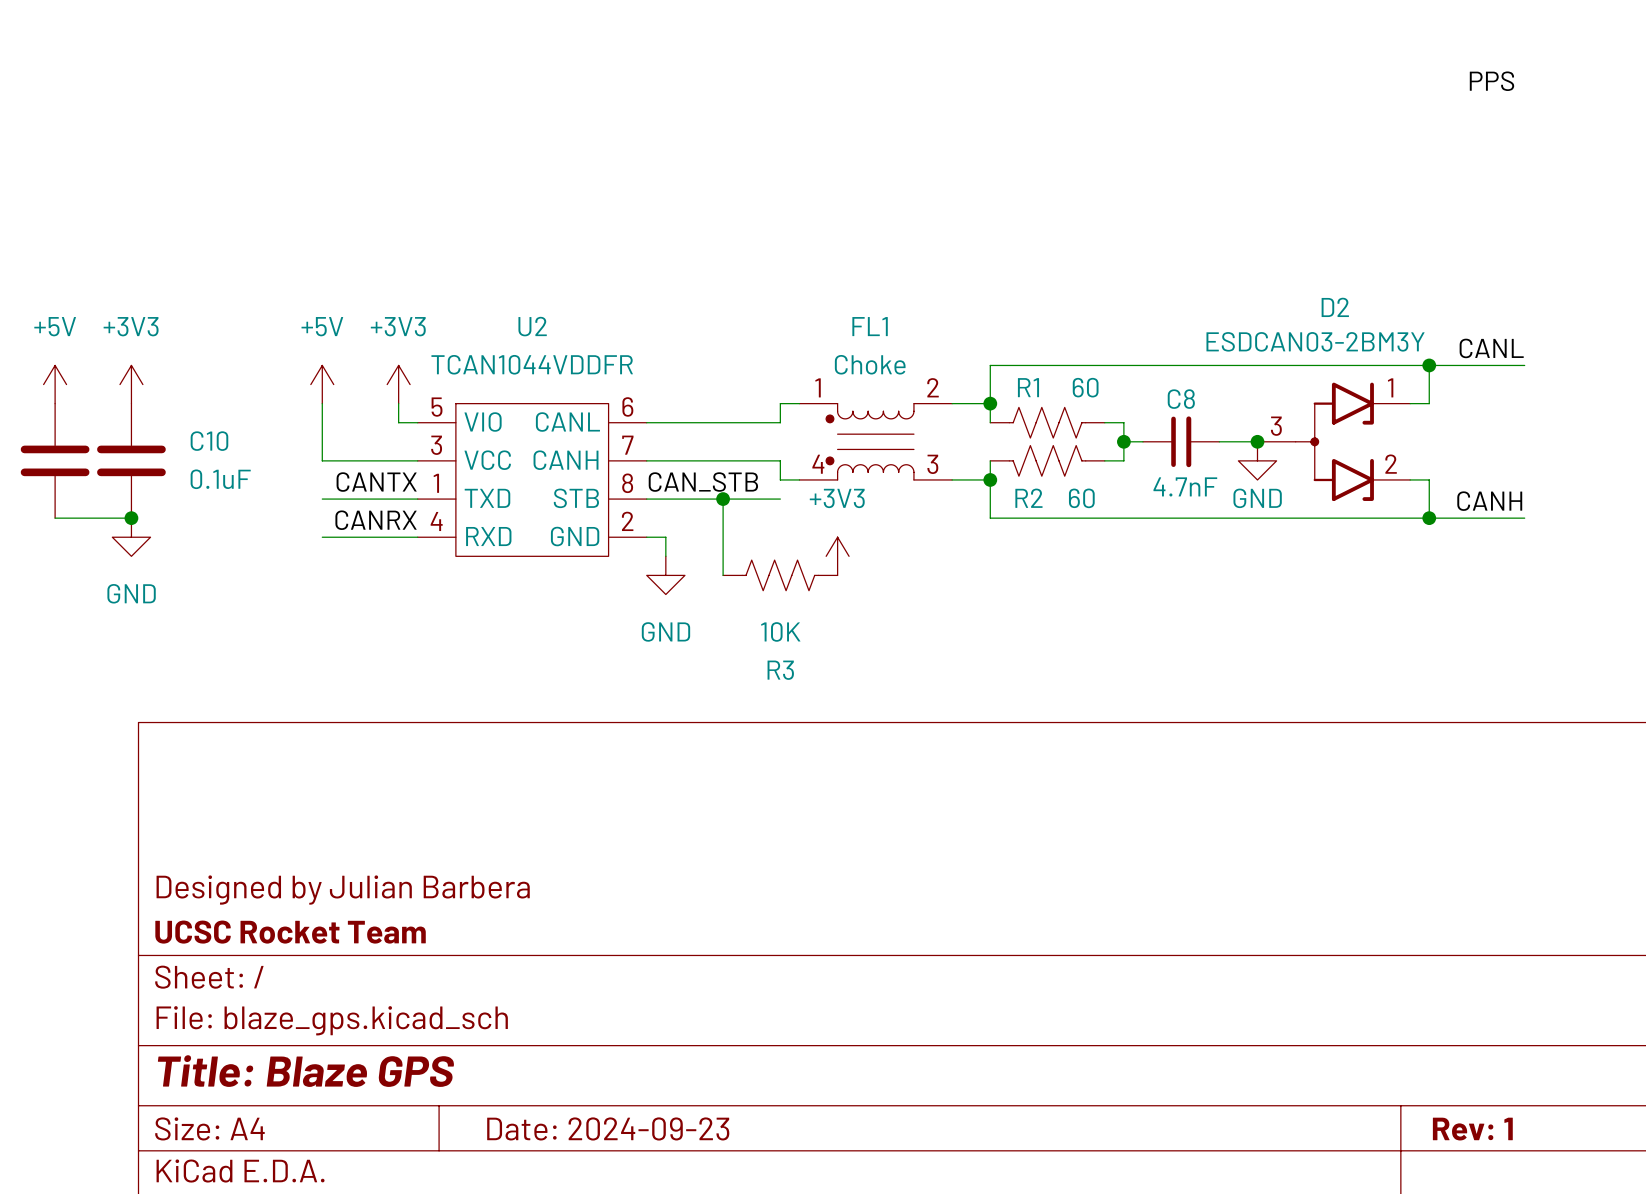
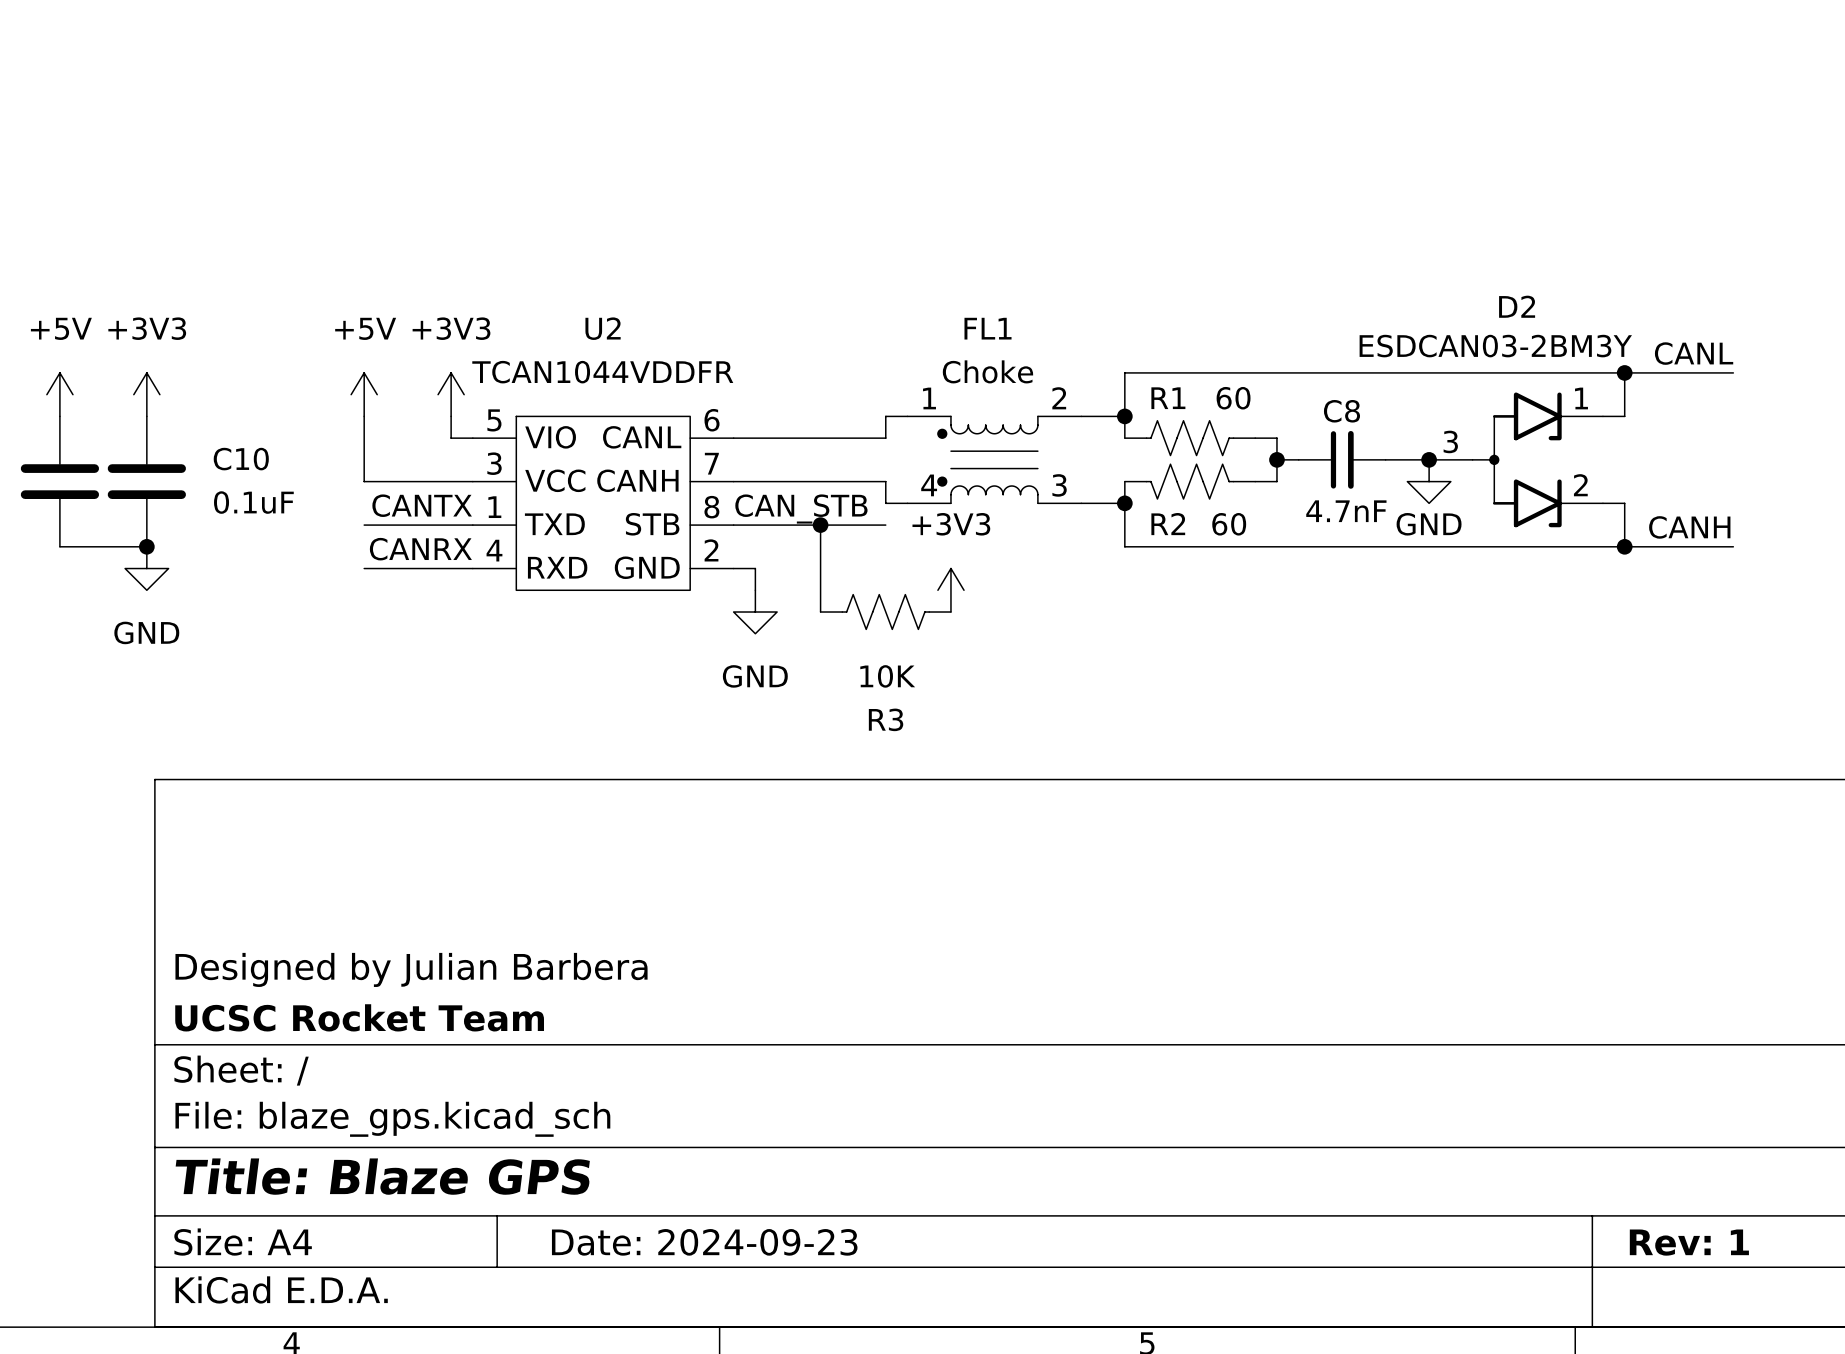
label: PPS (1491, 81) -> none

